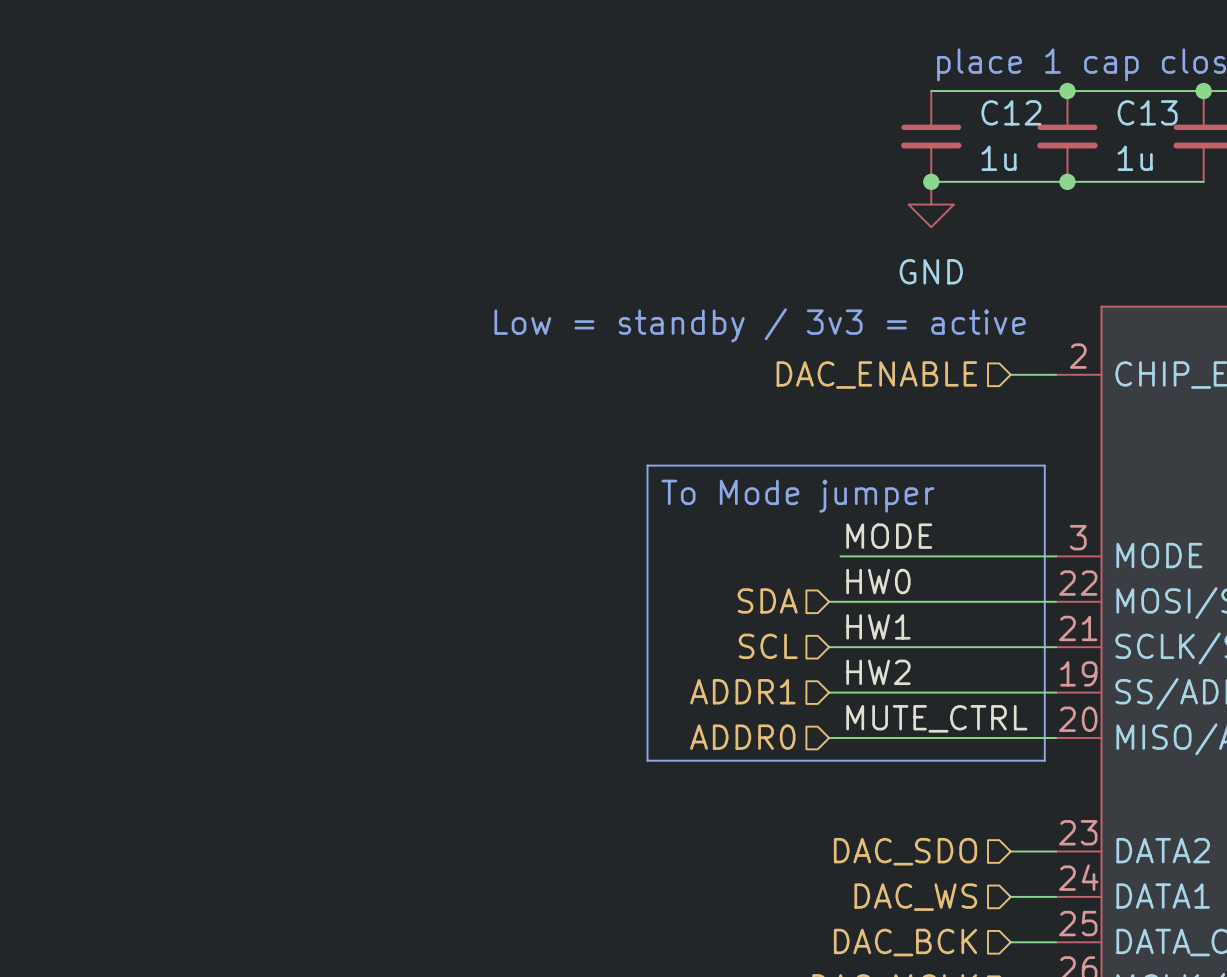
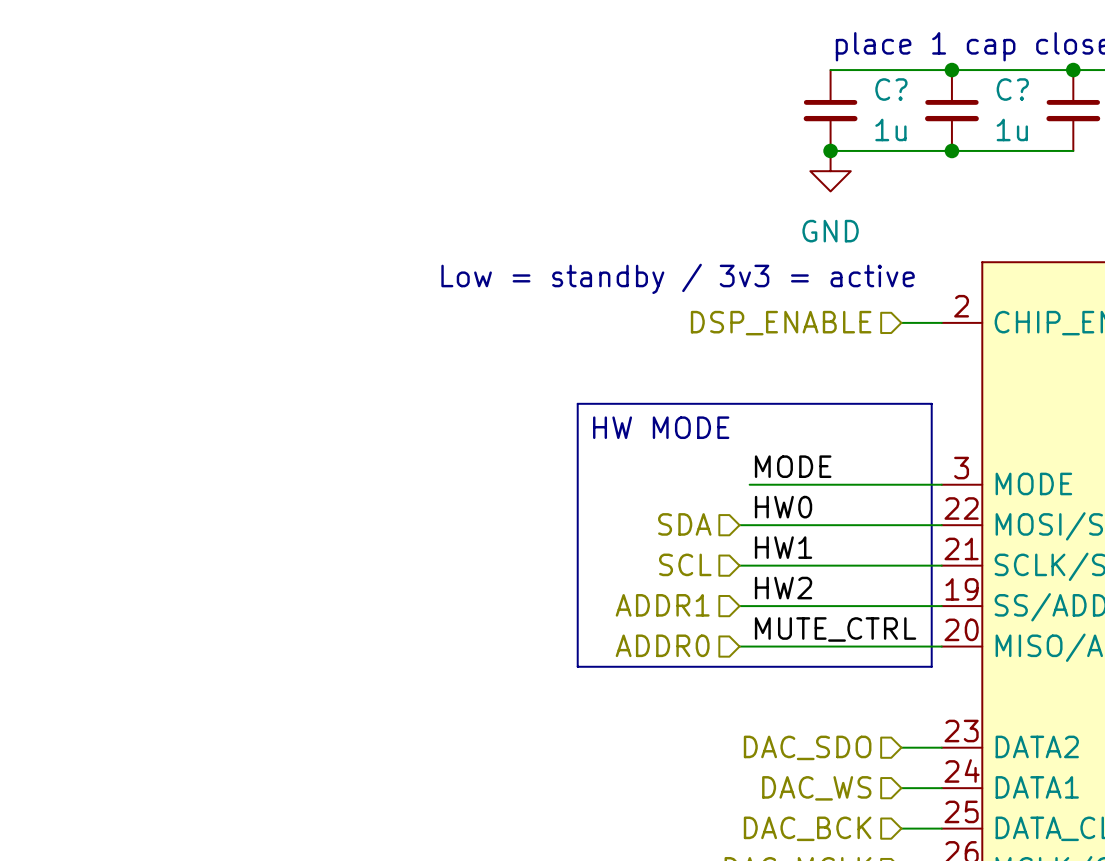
C12 name: C12 (1011, 112) -> C? (891, 89)
C13 name: C13 (1147, 112) -> C? (1012, 89)
hierarchical label: DAC_ENABLE (876, 375) -> DSP_ENABLE (781, 323)
text: To Mode jumper (797, 496) -> HW MODE (661, 427)

